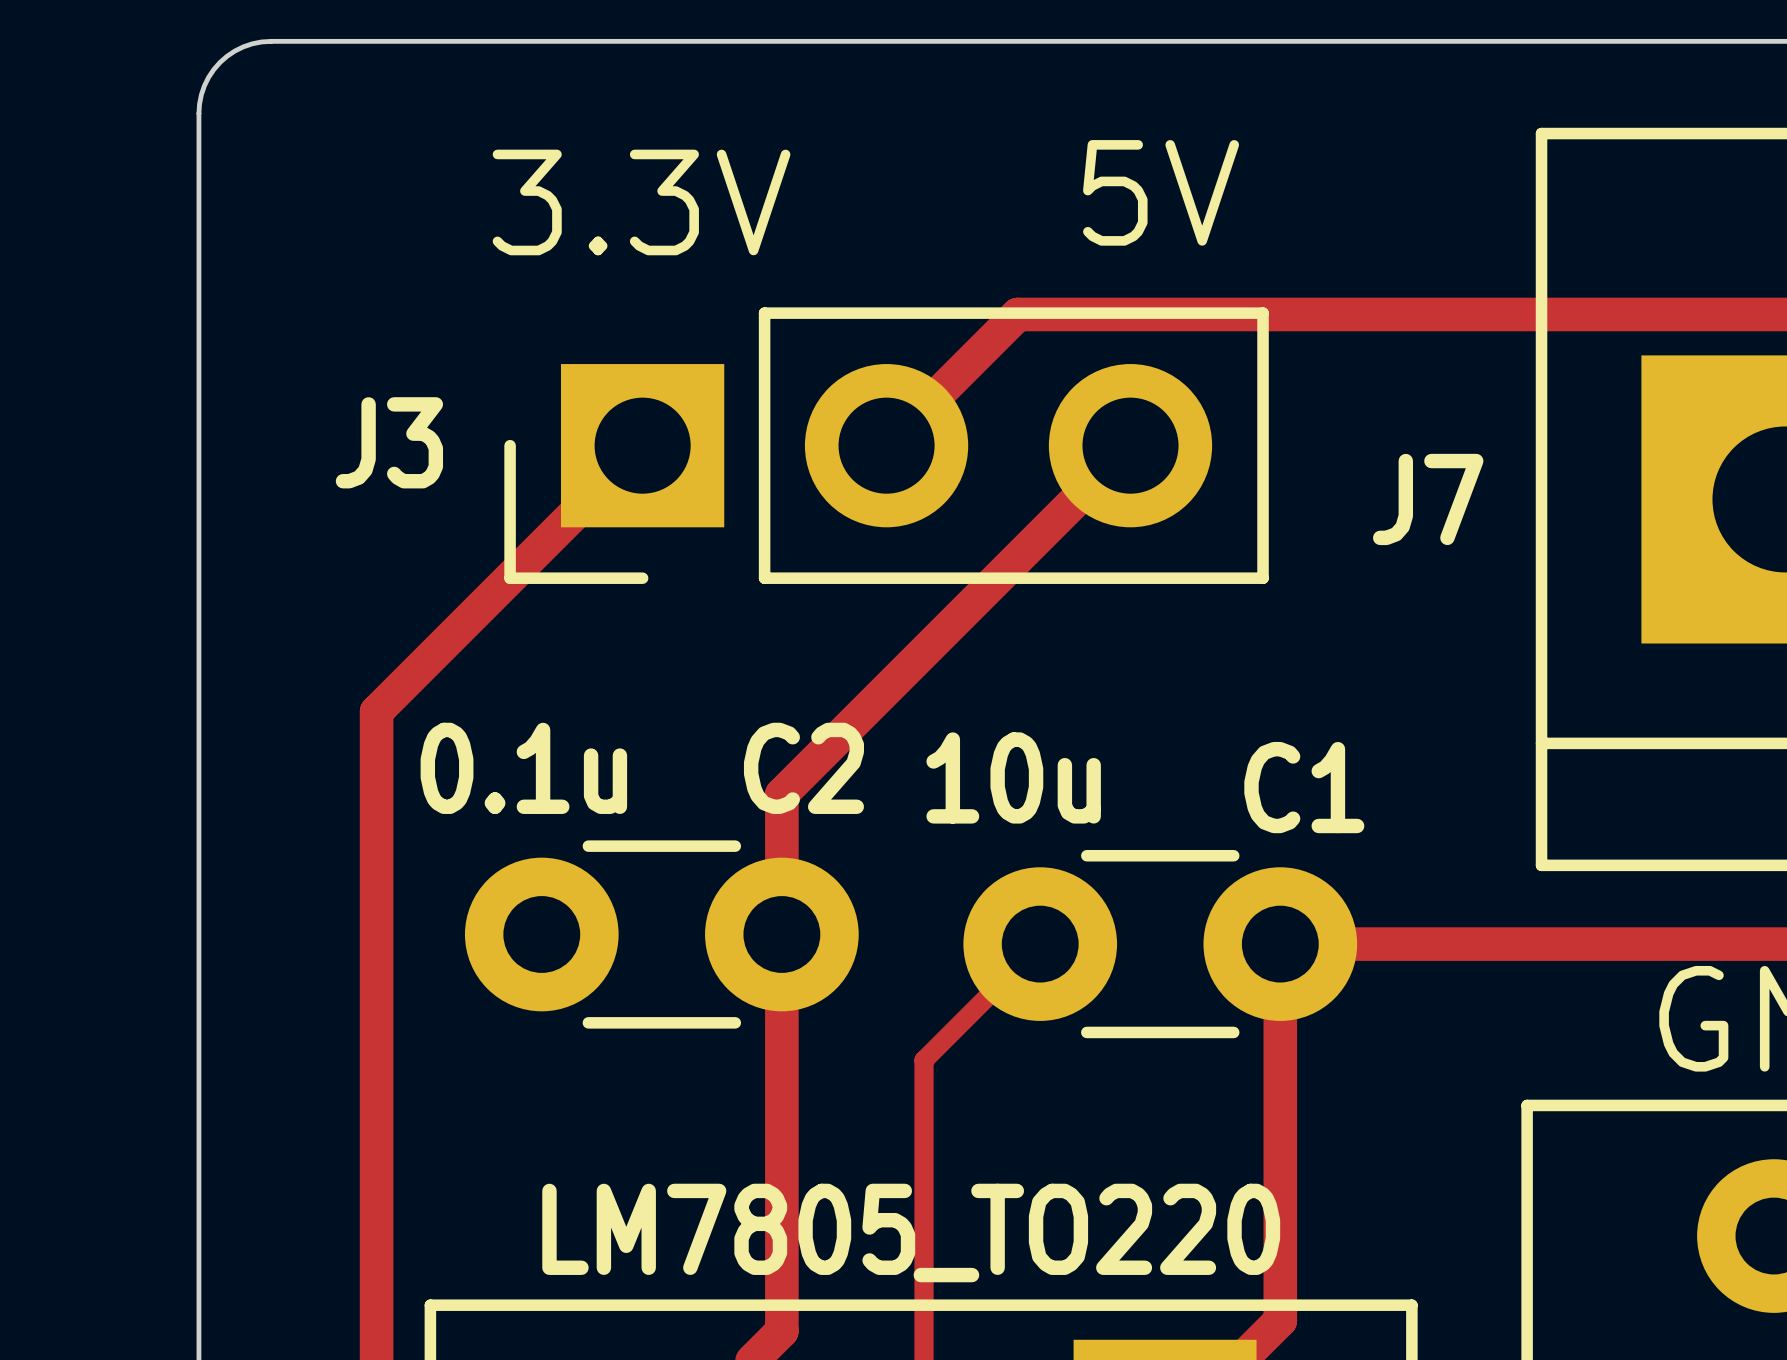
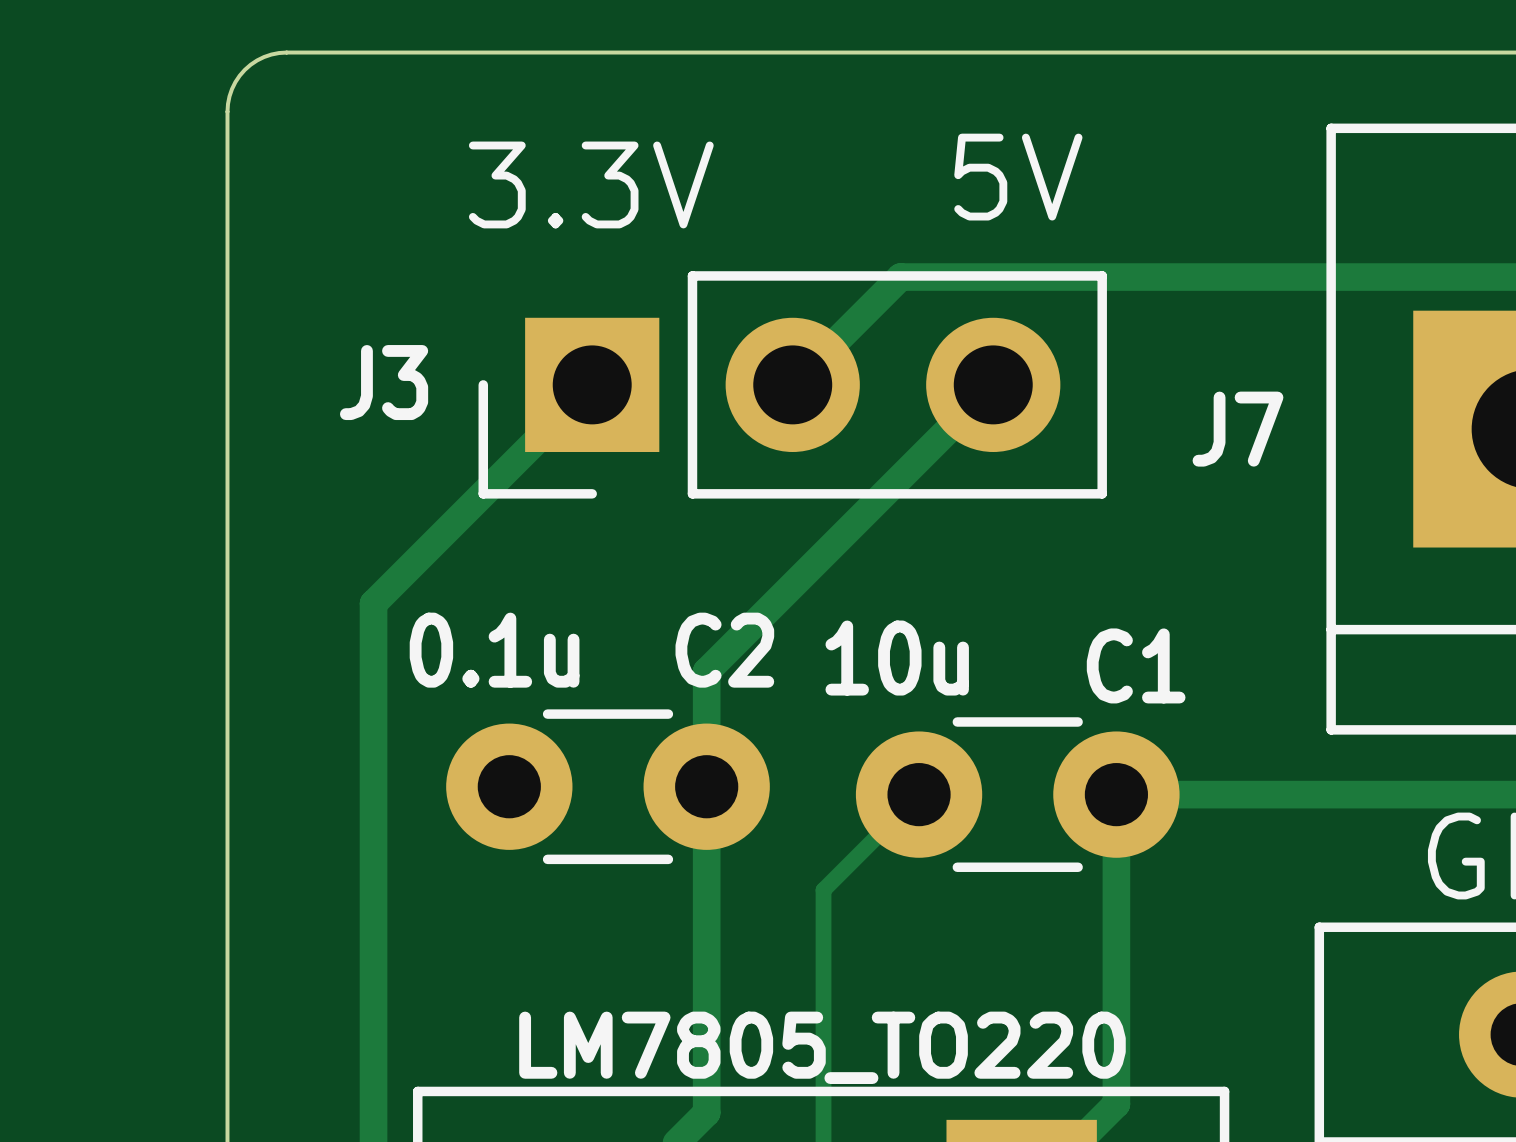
part value position: LM7805_TO220 (911, 1233) -> LM7805_TO220 (822, 1047)

